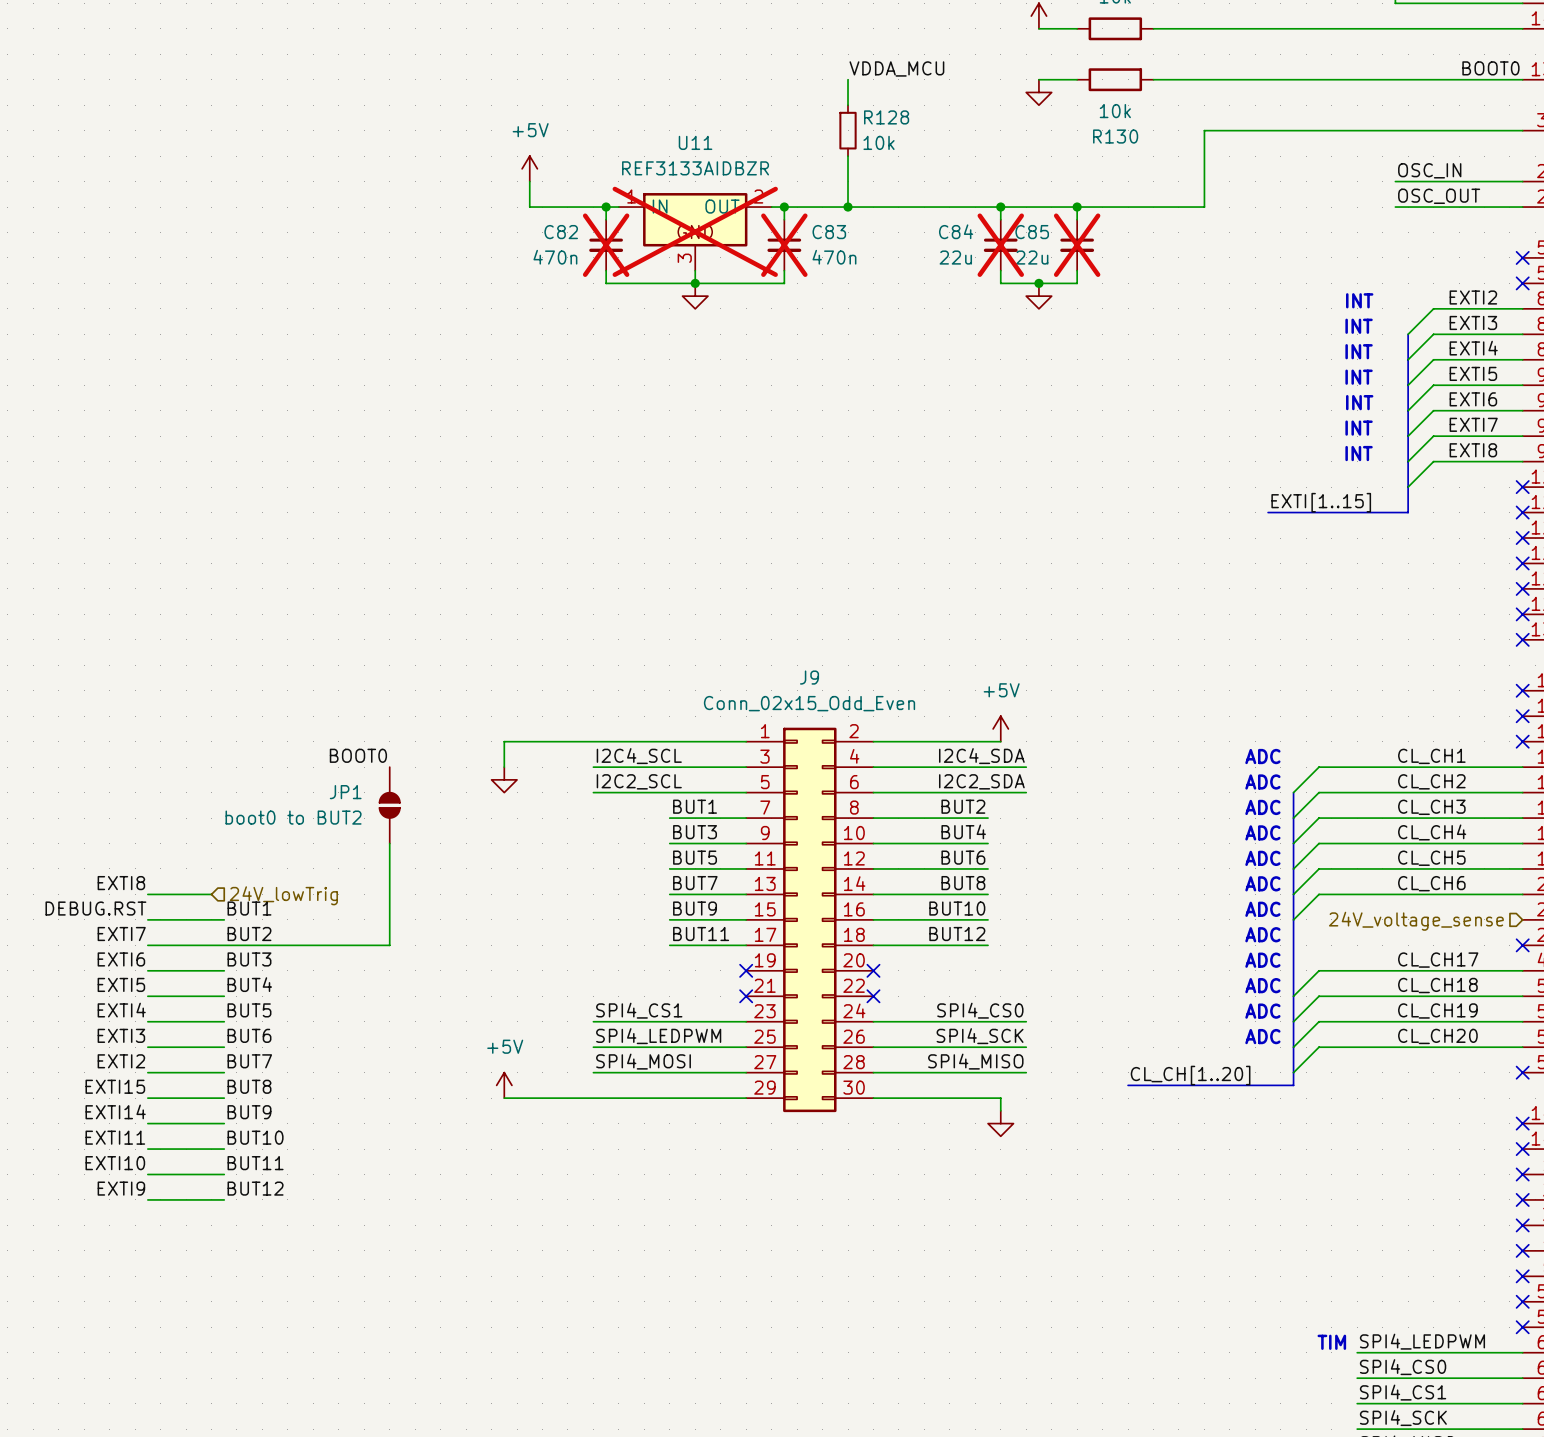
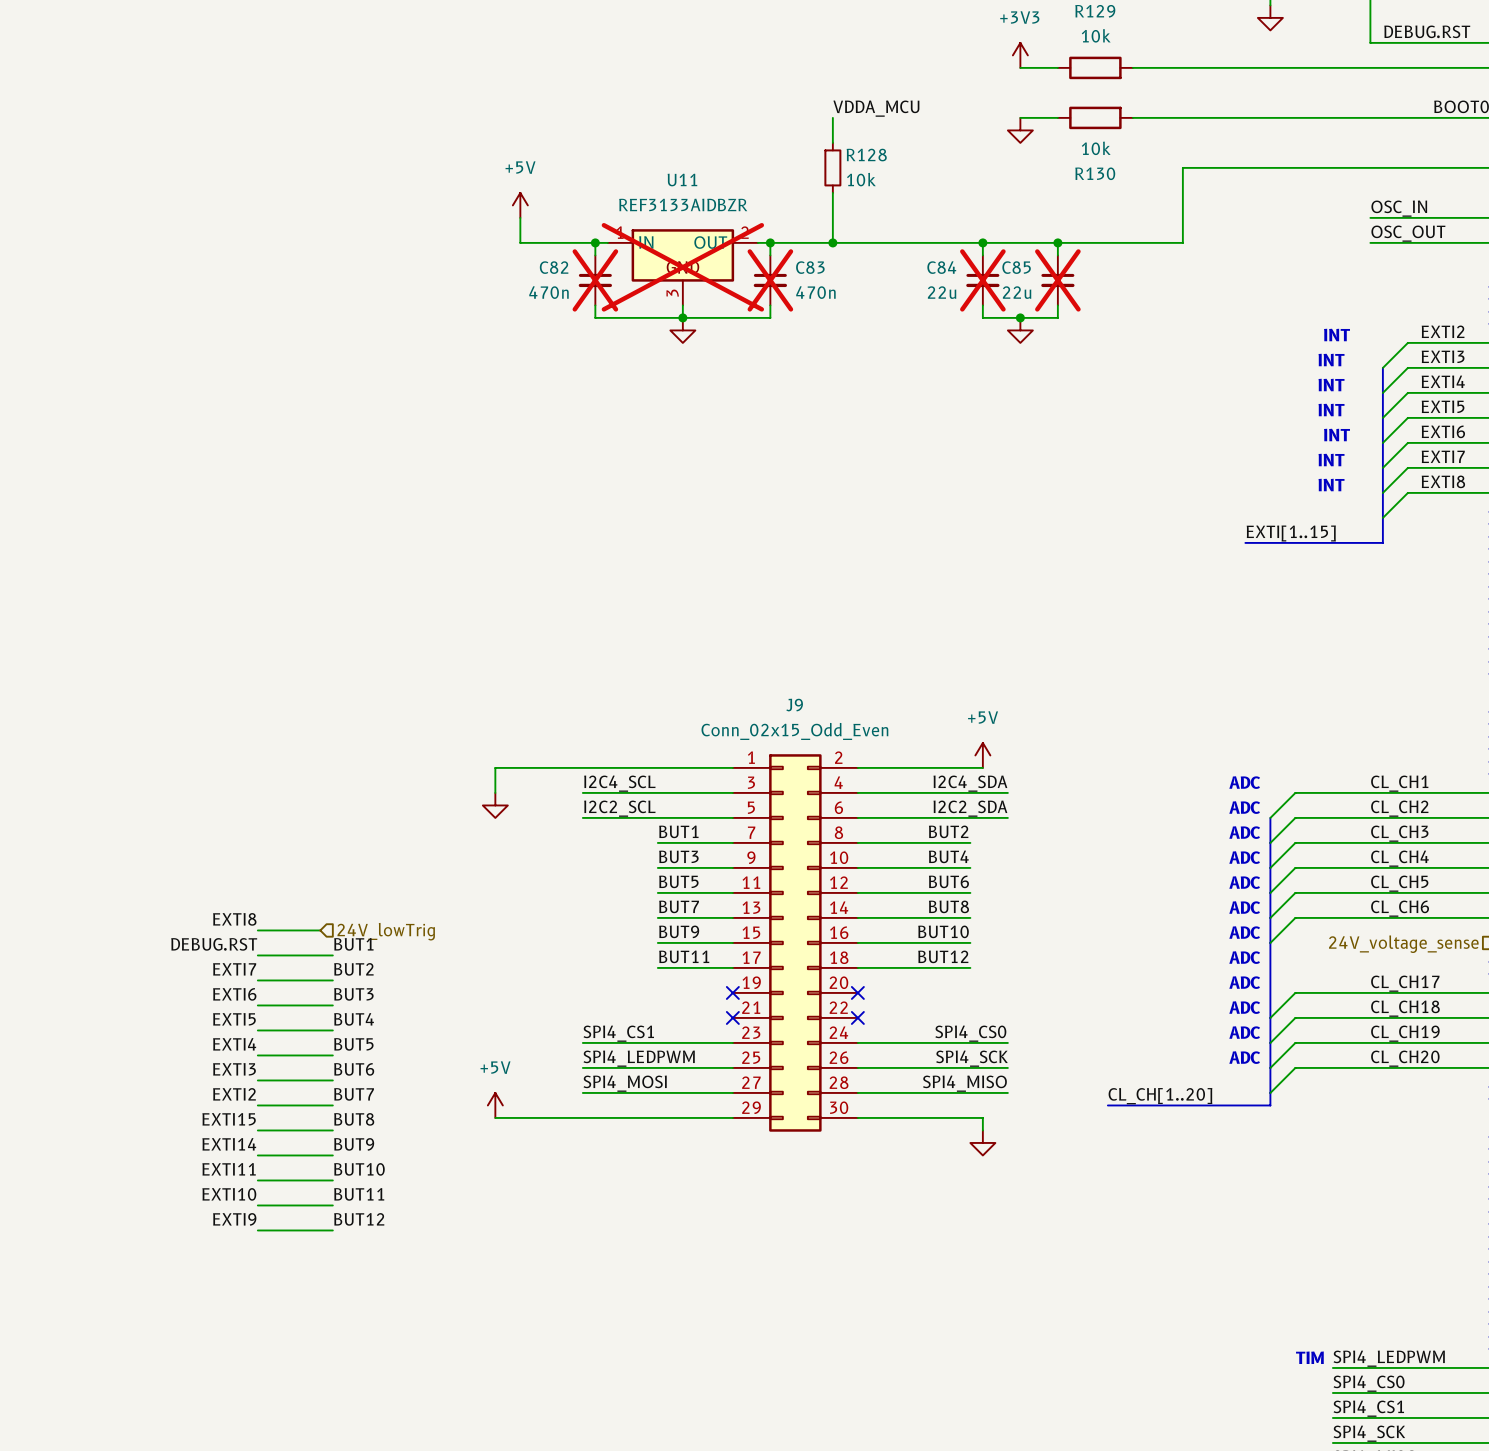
label: BOOT0 (358, 755) -> none
JP1: boot0 to BUT2 (389, 805) -> none
wire: (389, 843) (389, 945) (147, 945) -> none
label position: EXTI8 (121, 883) -> EXTI8 (234, 919)
wire: (147, 894) (211, 894) -> (257, 930) (320, 930)
hierarchical label position: 24V_lowTrig (283, 895) -> 24V_lowTrig (386, 931)
label position: DEBUG.RST (95, 908) -> DEBUG.RST (214, 944)
label position: BUT1 (249, 908) -> BUT1 (353, 944)
wire: (147, 919) (224, 919) -> (257, 955) (332, 955)
label position: EXTI7 (121, 934) -> EXTI7 (234, 969)
label position: BUT2 (249, 934) -> BUT2 (353, 969)
wire: none -> (257, 980) (332, 980)
label position: EXTI6 (121, 959) -> EXTI6 (234, 994)
label position: BUT3 (249, 959) -> BUT3 (353, 994)
wire: (147, 970) (224, 970) -> (257, 1005) (332, 1005)
label position: EXTI5 (121, 984) -> EXTI5 (234, 1019)
label position: BUT4 (249, 984) -> BUT4 (354, 1019)
wire: (147, 996) (224, 996) -> (257, 1030) (332, 1030)
label position: EXTI4 (121, 1010) -> EXTI4 (234, 1044)
label position: BUT5 (249, 1010) -> BUT5 (353, 1044)
wire: (147, 1021) (224, 1021) -> (257, 1055) (332, 1055)
label position: EXTI3 (121, 1035) -> EXTI3 (234, 1069)
label position: BUT6 (249, 1035) -> BUT6 (354, 1069)
wire: (147, 1047) (224, 1047) -> (257, 1080) (332, 1080)
label position: EXTI2 (121, 1061) -> EXTI2 (234, 1094)
label position: BUT7 (249, 1061) -> BUT7 (354, 1094)
wire: (147, 1072) (224, 1072) -> (257, 1105) (332, 1105)
label position: EXTI15 (115, 1086) -> EXTI15 (229, 1119)
label position: BUT8 (249, 1086) -> BUT8 (354, 1119)
wire: (147, 1098) (224, 1098) -> (257, 1130) (332, 1130)
label position: EXTI14 (115, 1111) -> EXTI14 (229, 1144)
label position: BUT9 (249, 1112) -> BUT9 (354, 1144)
wire: (147, 1123) (224, 1123) -> (257, 1155) (332, 1155)
label position: EXTI11 (115, 1137) -> EXTI11 (229, 1169)
label position: BUT10 (255, 1137) -> BUT10 (359, 1169)
wire: (147, 1149) (224, 1149) -> (257, 1180) (332, 1180)
label position: EXTI10 (115, 1163) -> EXTI10 (229, 1194)
label position: BUT11 (255, 1163) -> BUT11 (359, 1194)
wire: (147, 1174) (224, 1174) -> (257, 1205) (332, 1205)
label position: EXTI9 (121, 1188) -> EXTI9 (234, 1219)
label position: BUT12 (255, 1188) -> BUT12 (359, 1219)
wire: (147, 1199) (224, 1199) -> (257, 1230) (332, 1230)

